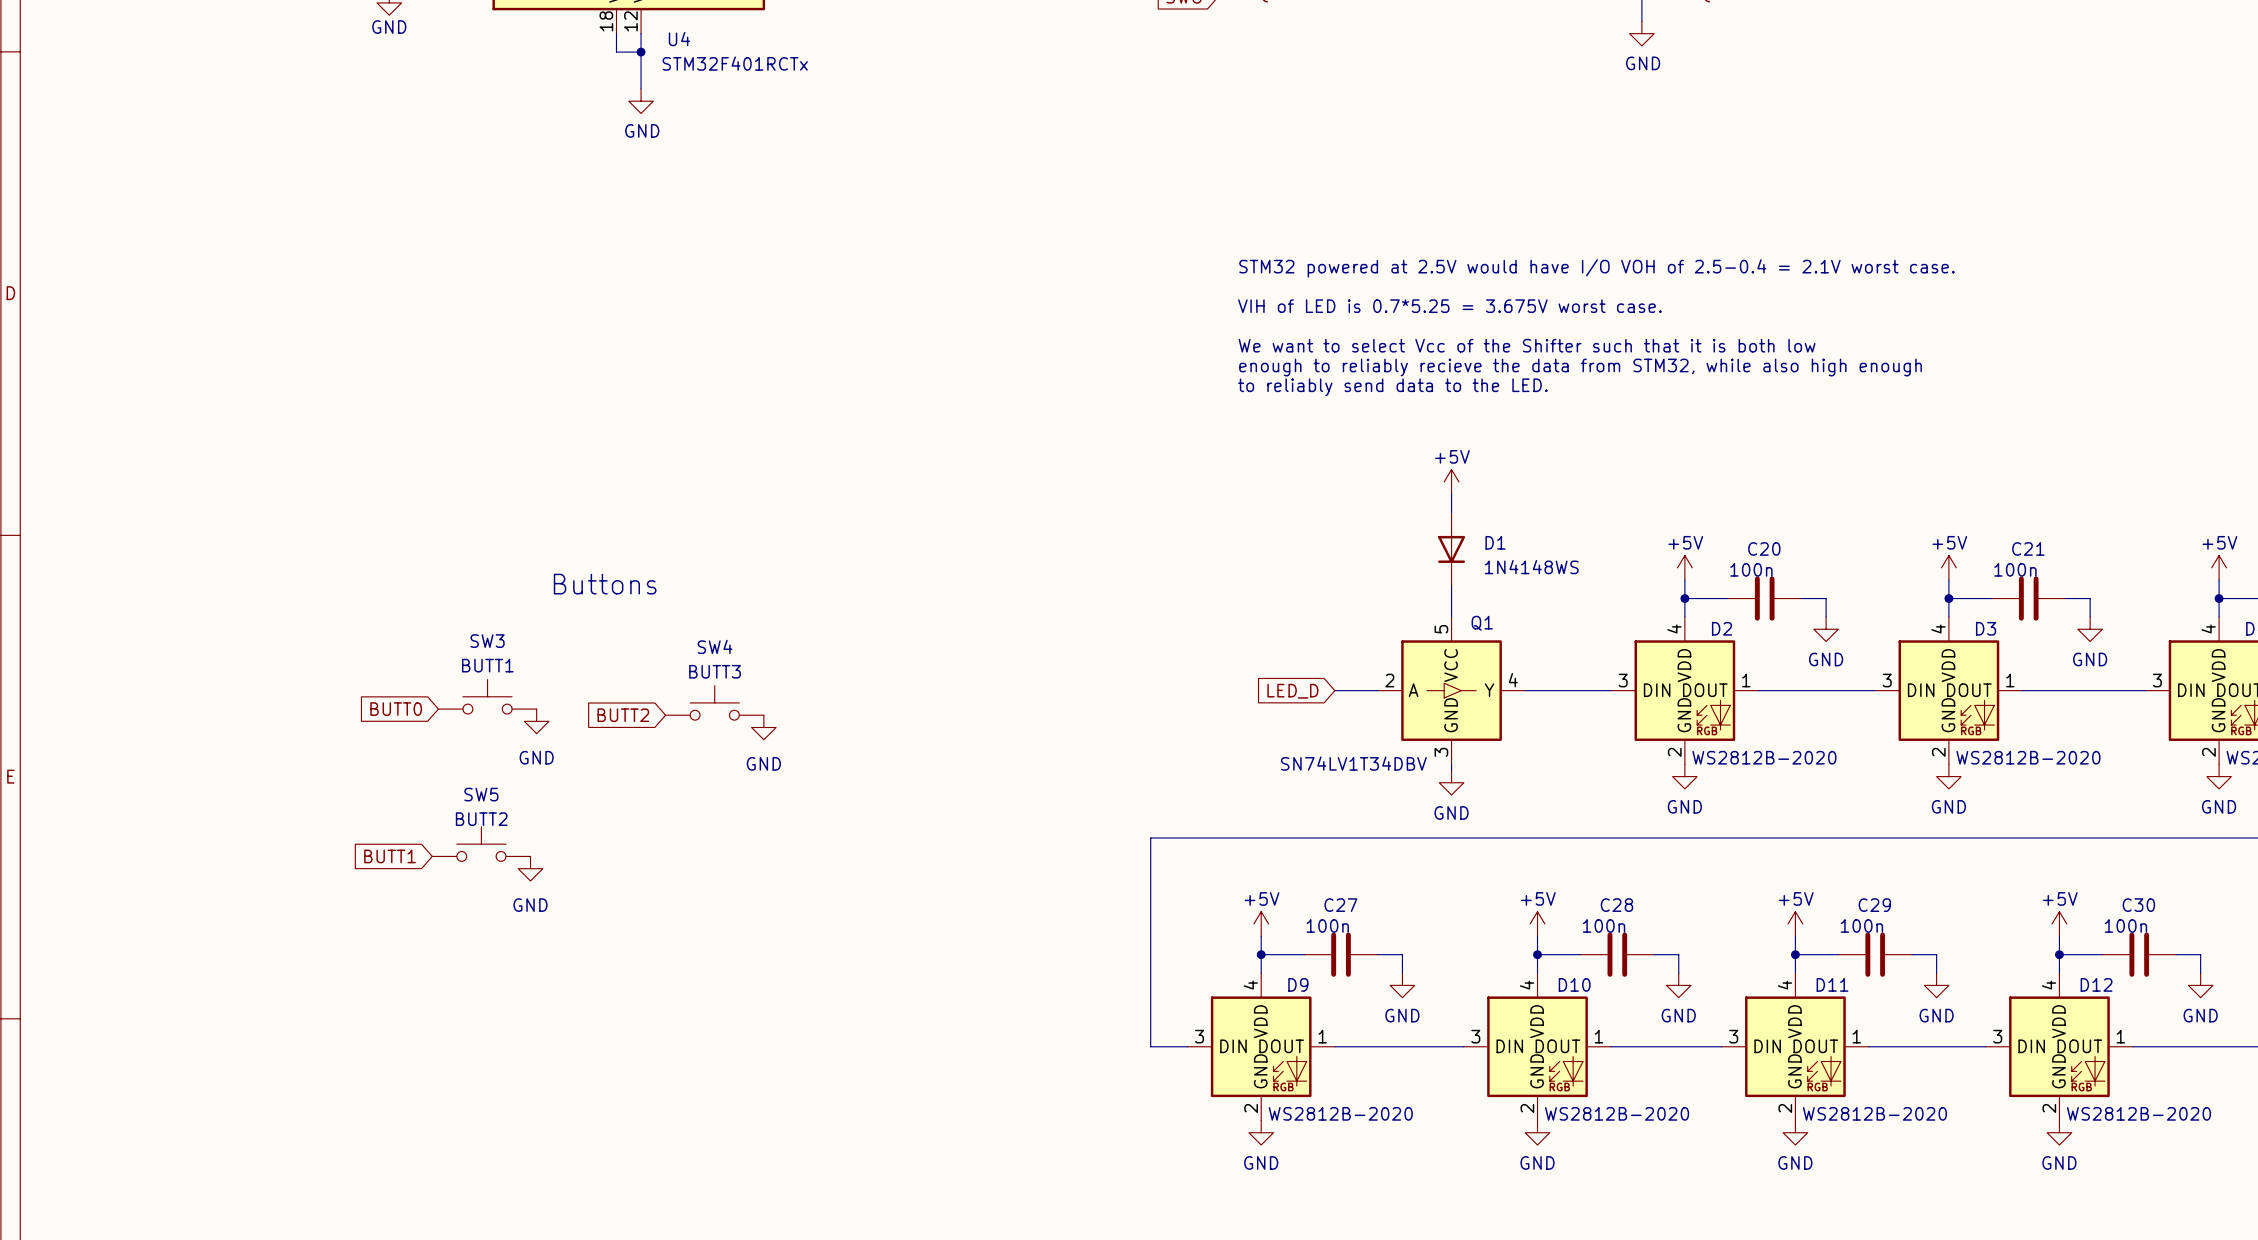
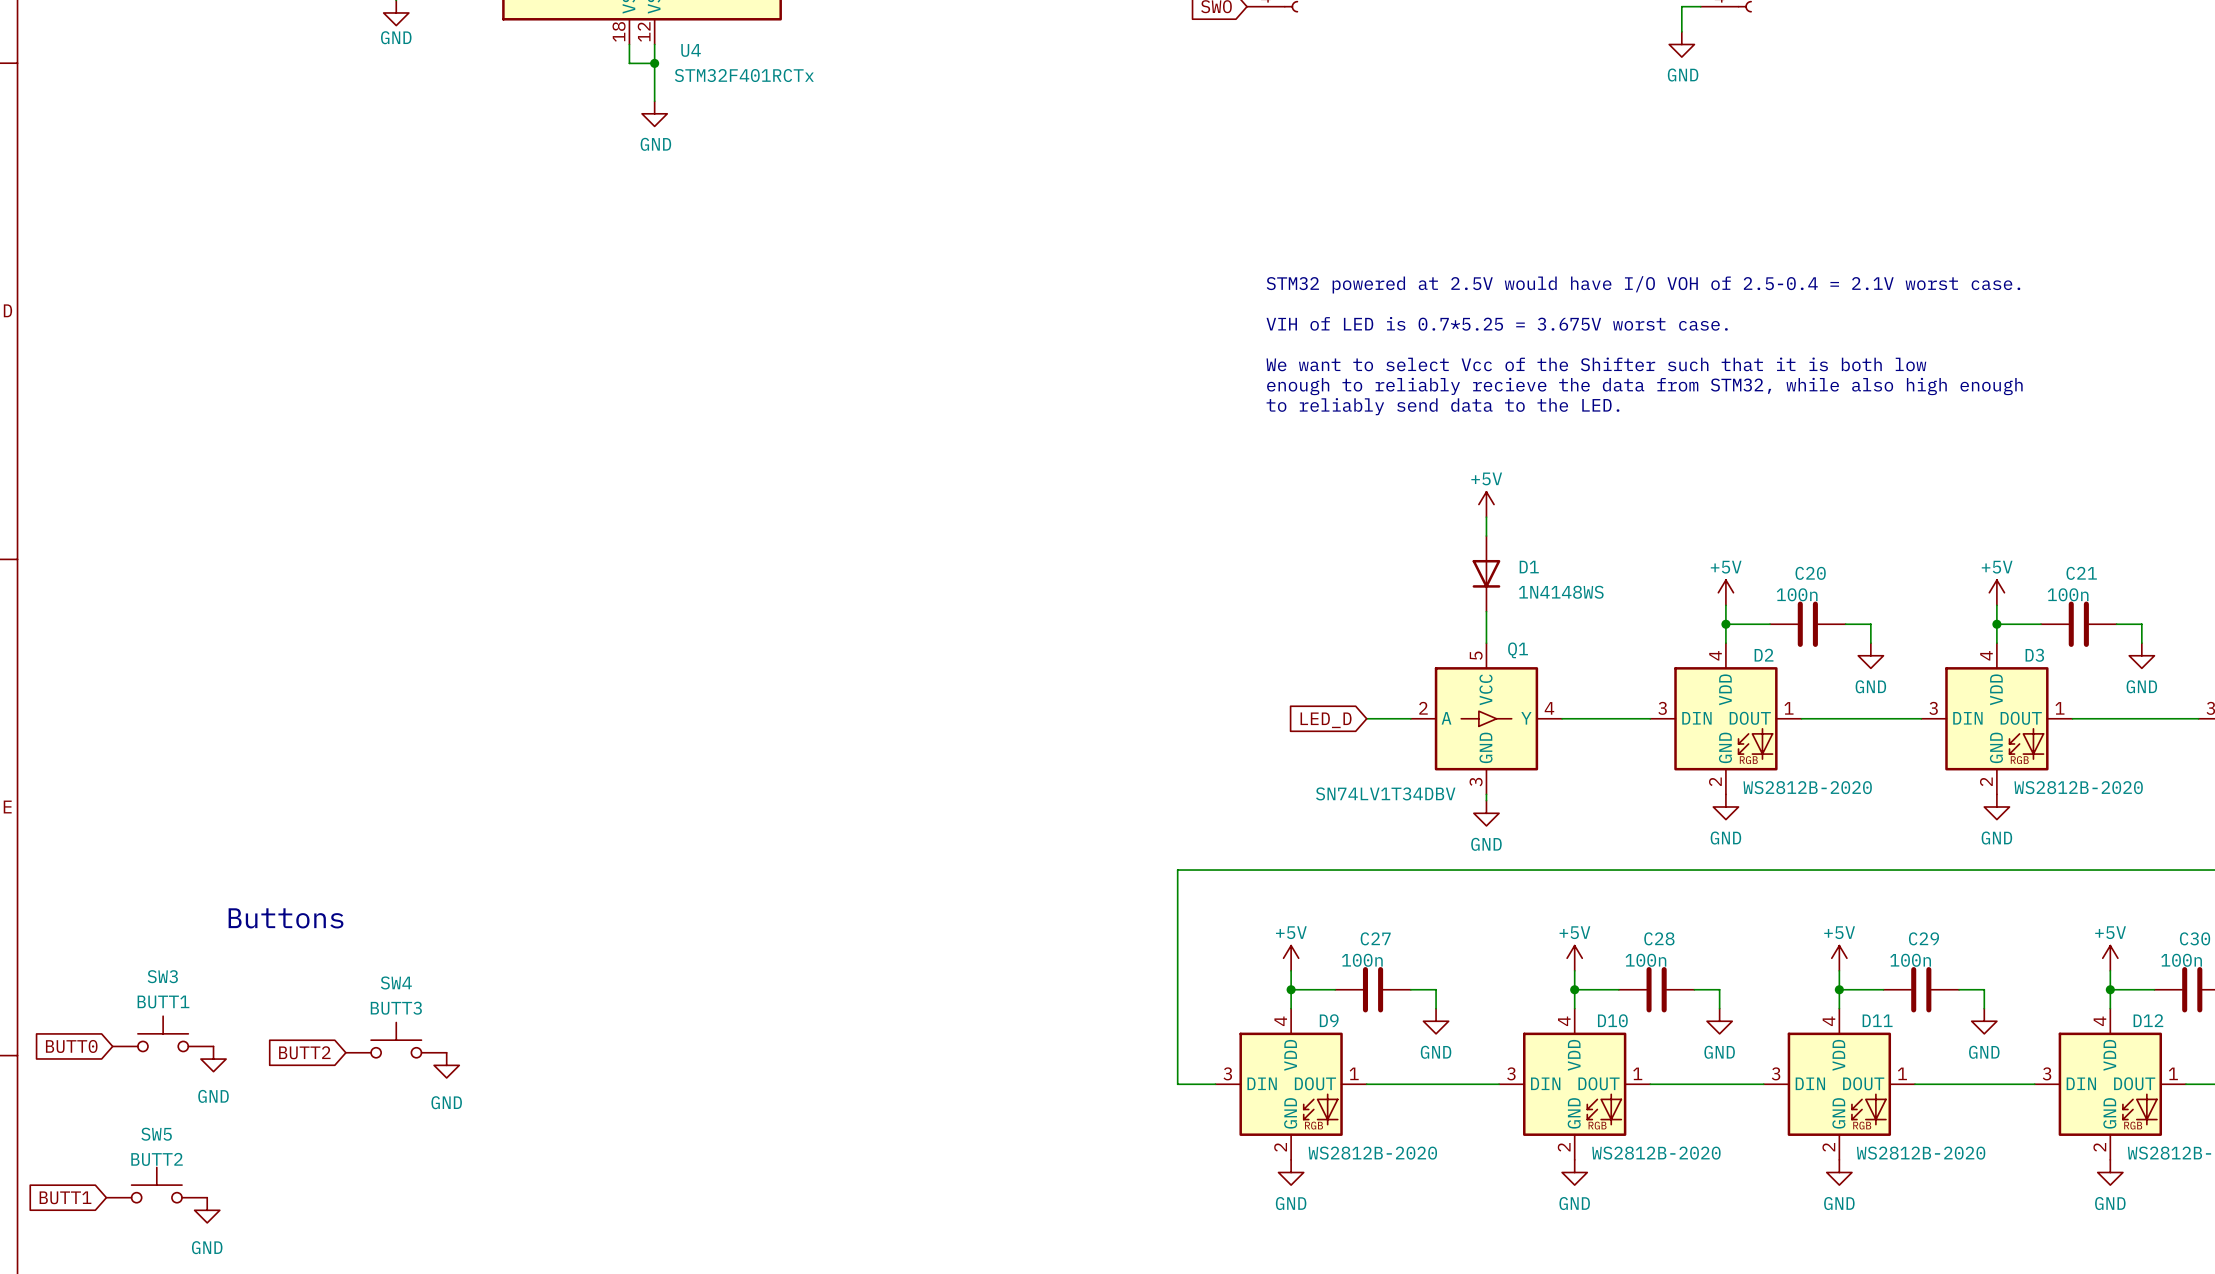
text: Buttons (605, 584) -> none
SW3 position: (487, 696) -> (163, 1033)
SW4 position: (714, 702) -> (396, 1040)
global label: BUTT0 (396, 709) -> none
global label: BUTT2 (623, 715) -> none
power symbol: GND (536, 721) -> none
power symbol: GND (763, 727) -> none
SW5 position: (481, 844) -> (156, 1185)
global label: BUTT1 (390, 856) -> none
power symbol: GND (530, 868) -> none
text: none -> Buttons (286, 918)
global label: none -> BUTT0 (71, 1046)
global label: none -> BUTT2 (304, 1052)
power symbol: none -> GND (213, 1059)
power symbol: none -> GND (446, 1065)
global label: none -> BUTT1 (65, 1197)
power symbol: none -> GND (207, 1210)

